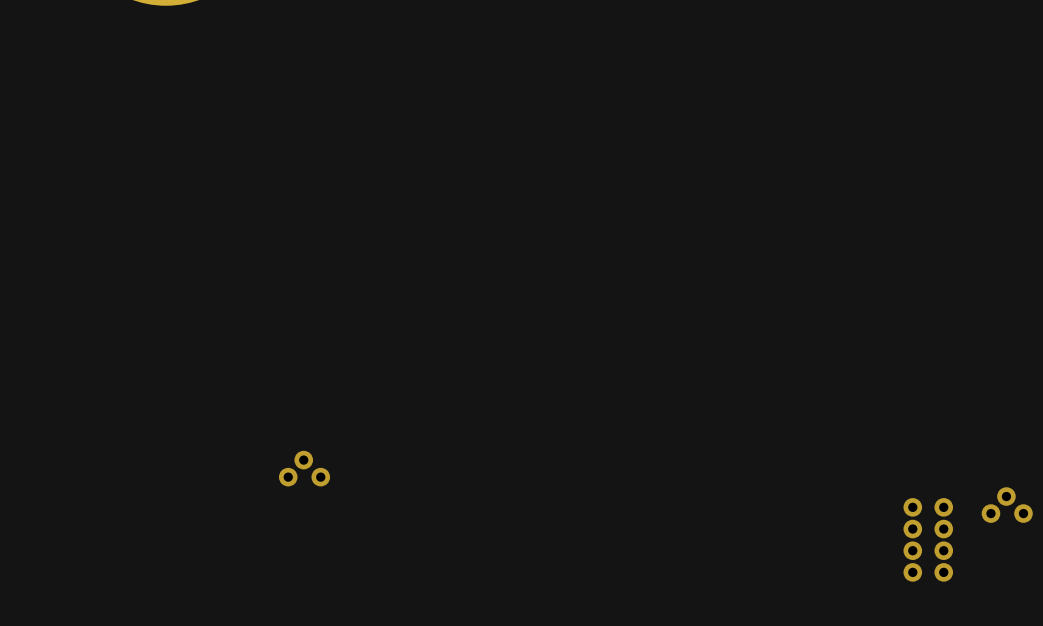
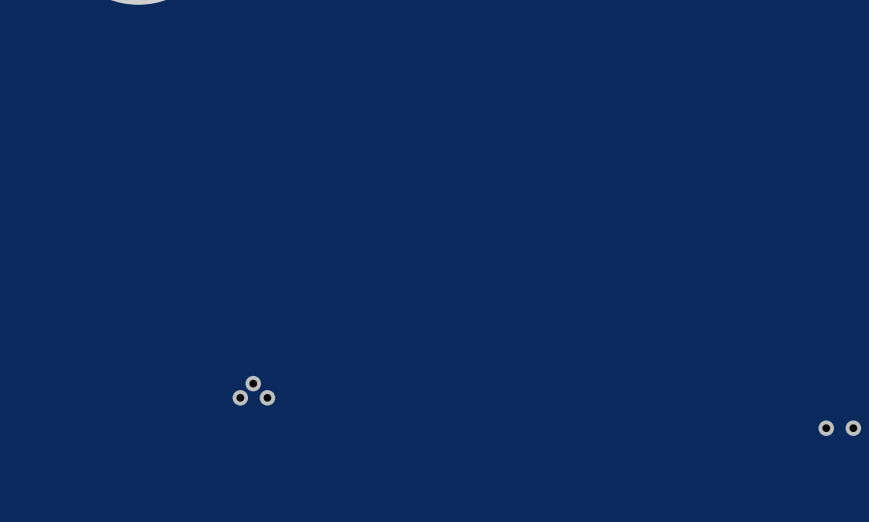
via: (1006, 496) -> none
via: (912, 507) -> none
via: (943, 507) -> none
via: (912, 529) -> none
via: (943, 529) -> none
via: (912, 550) -> none
via: (943, 550) -> none
via: (912, 572) -> none
via: (943, 572) -> none

